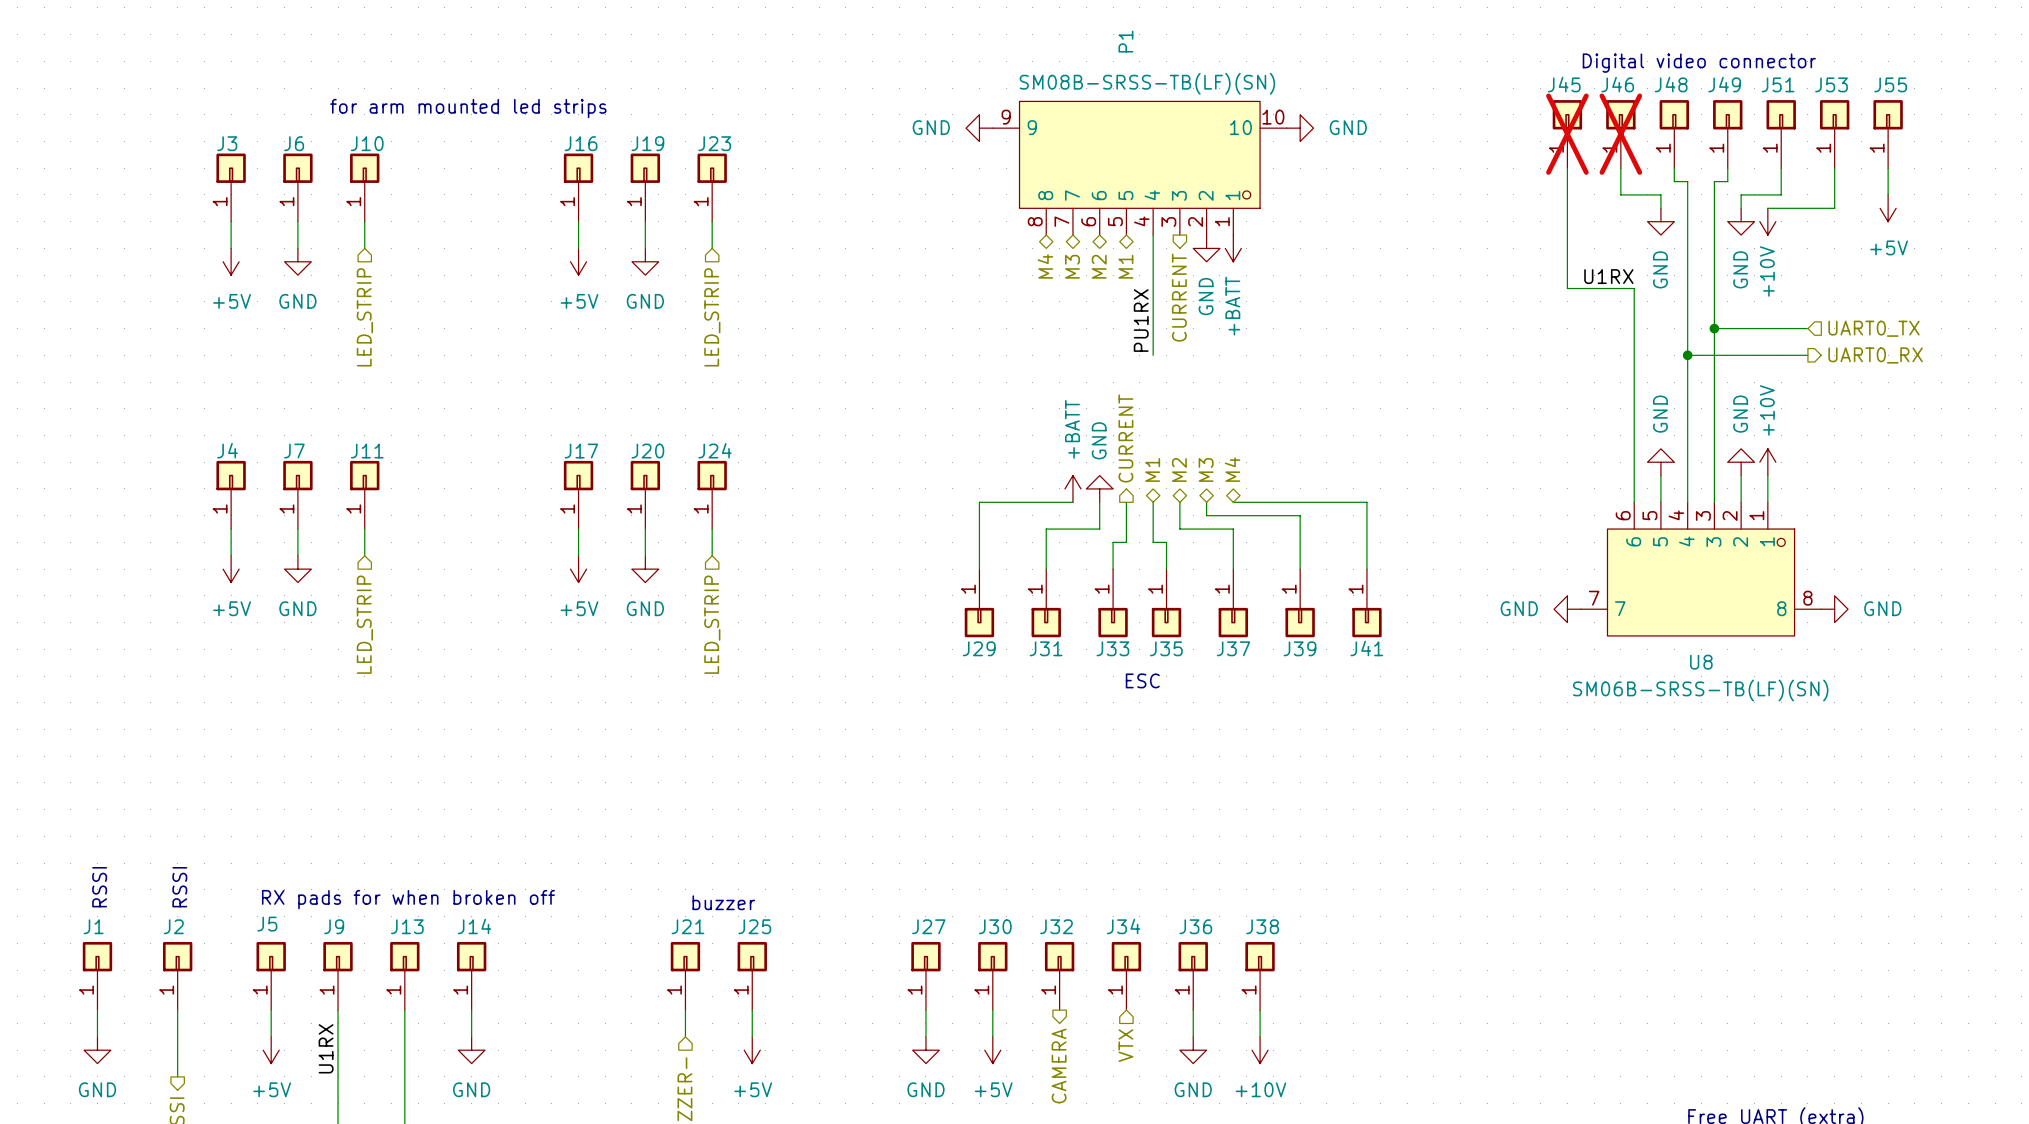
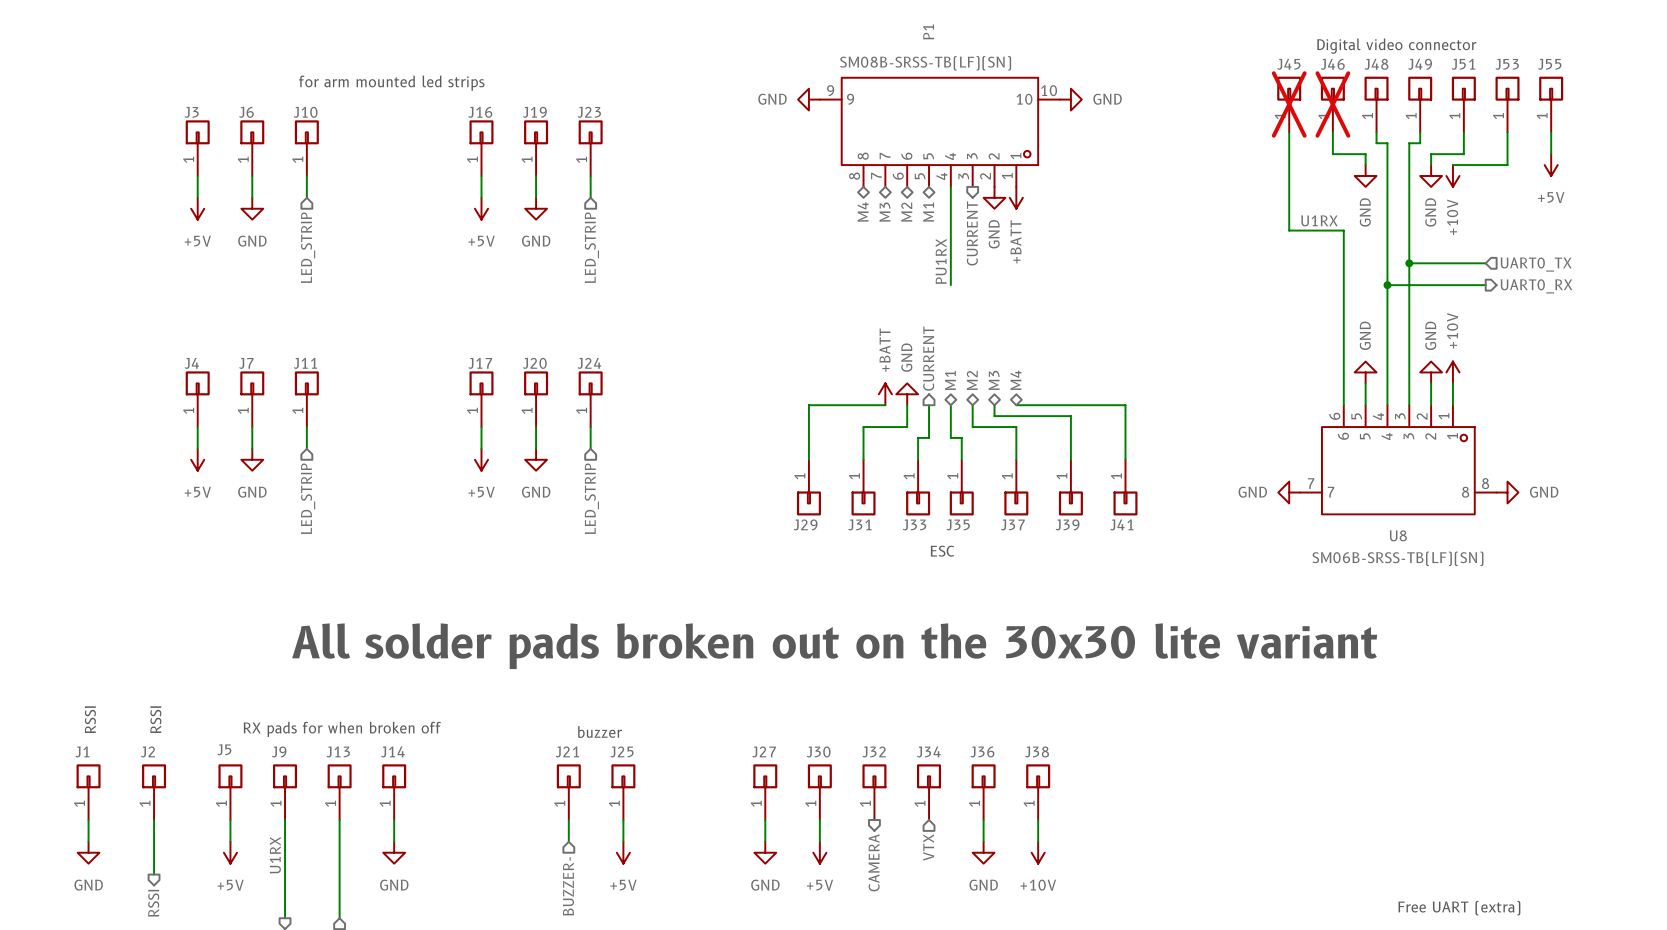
text: none -> All solder pads broken out on the 30x30 lite variant (834, 646)

